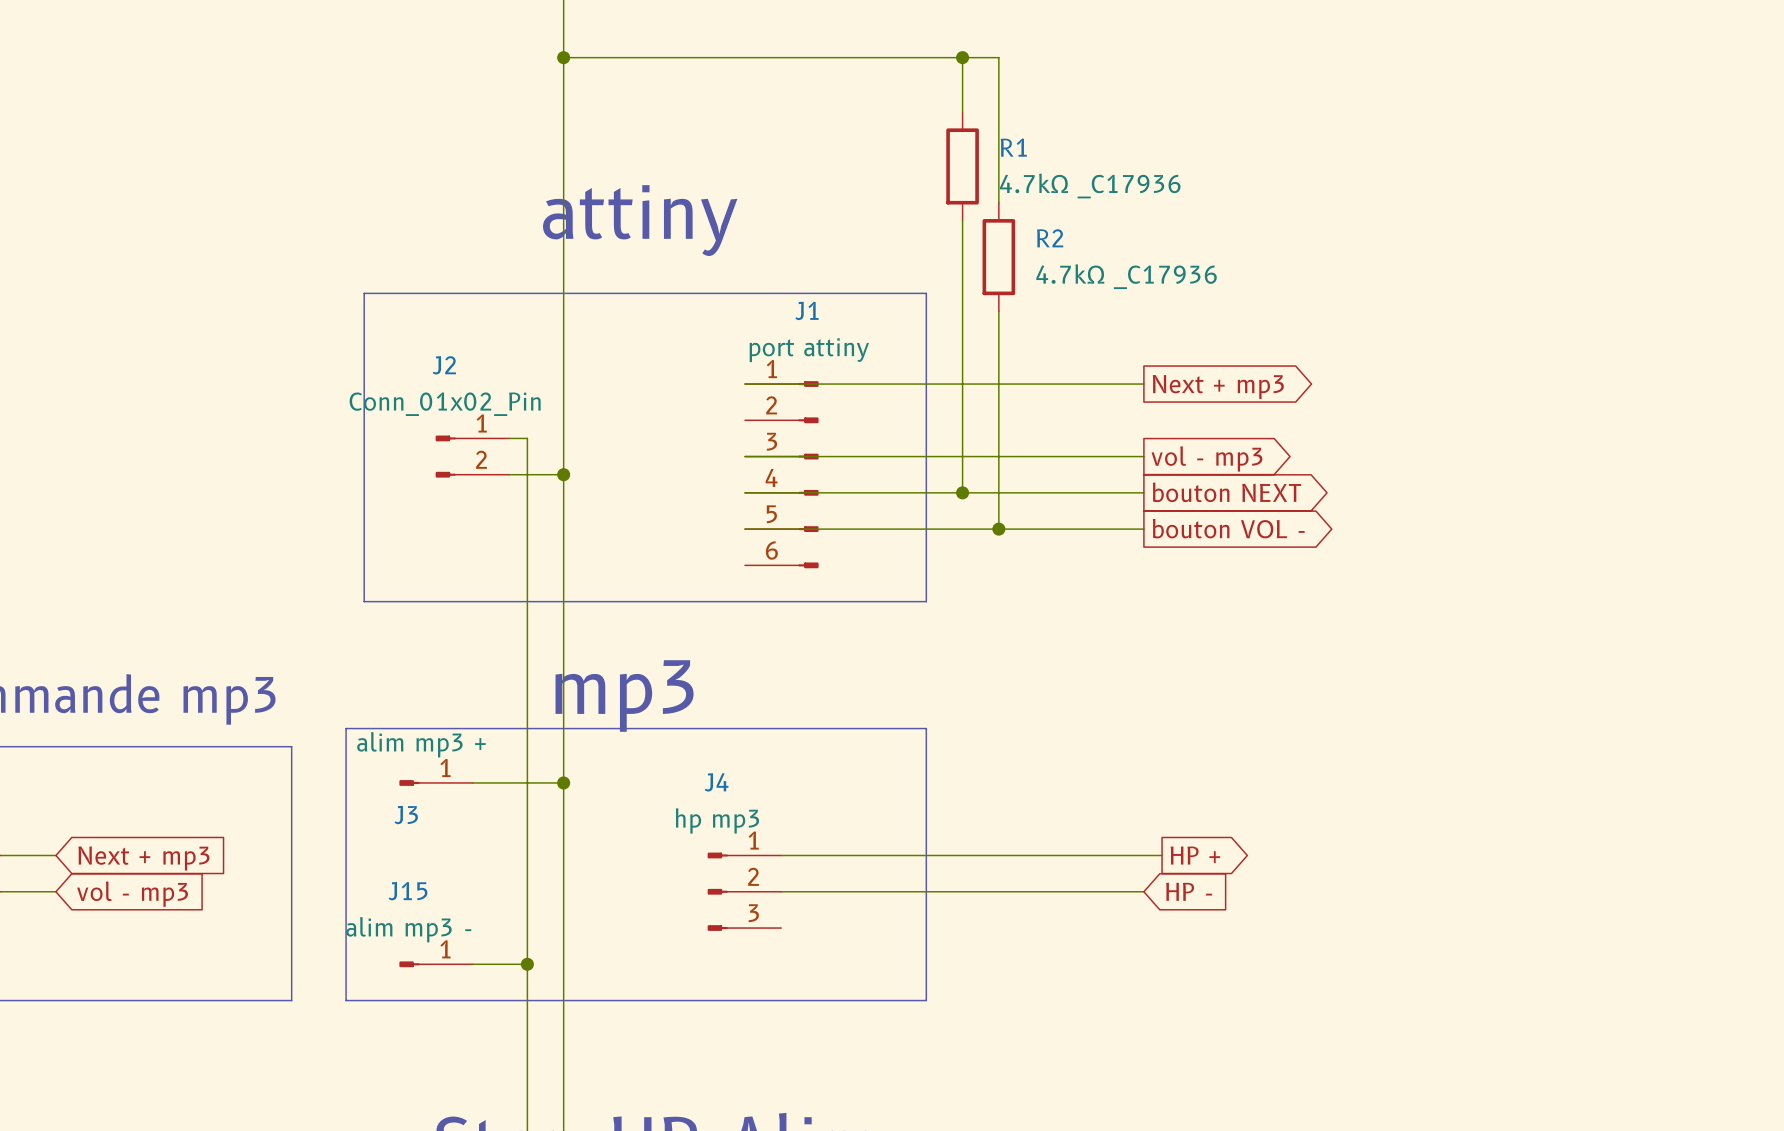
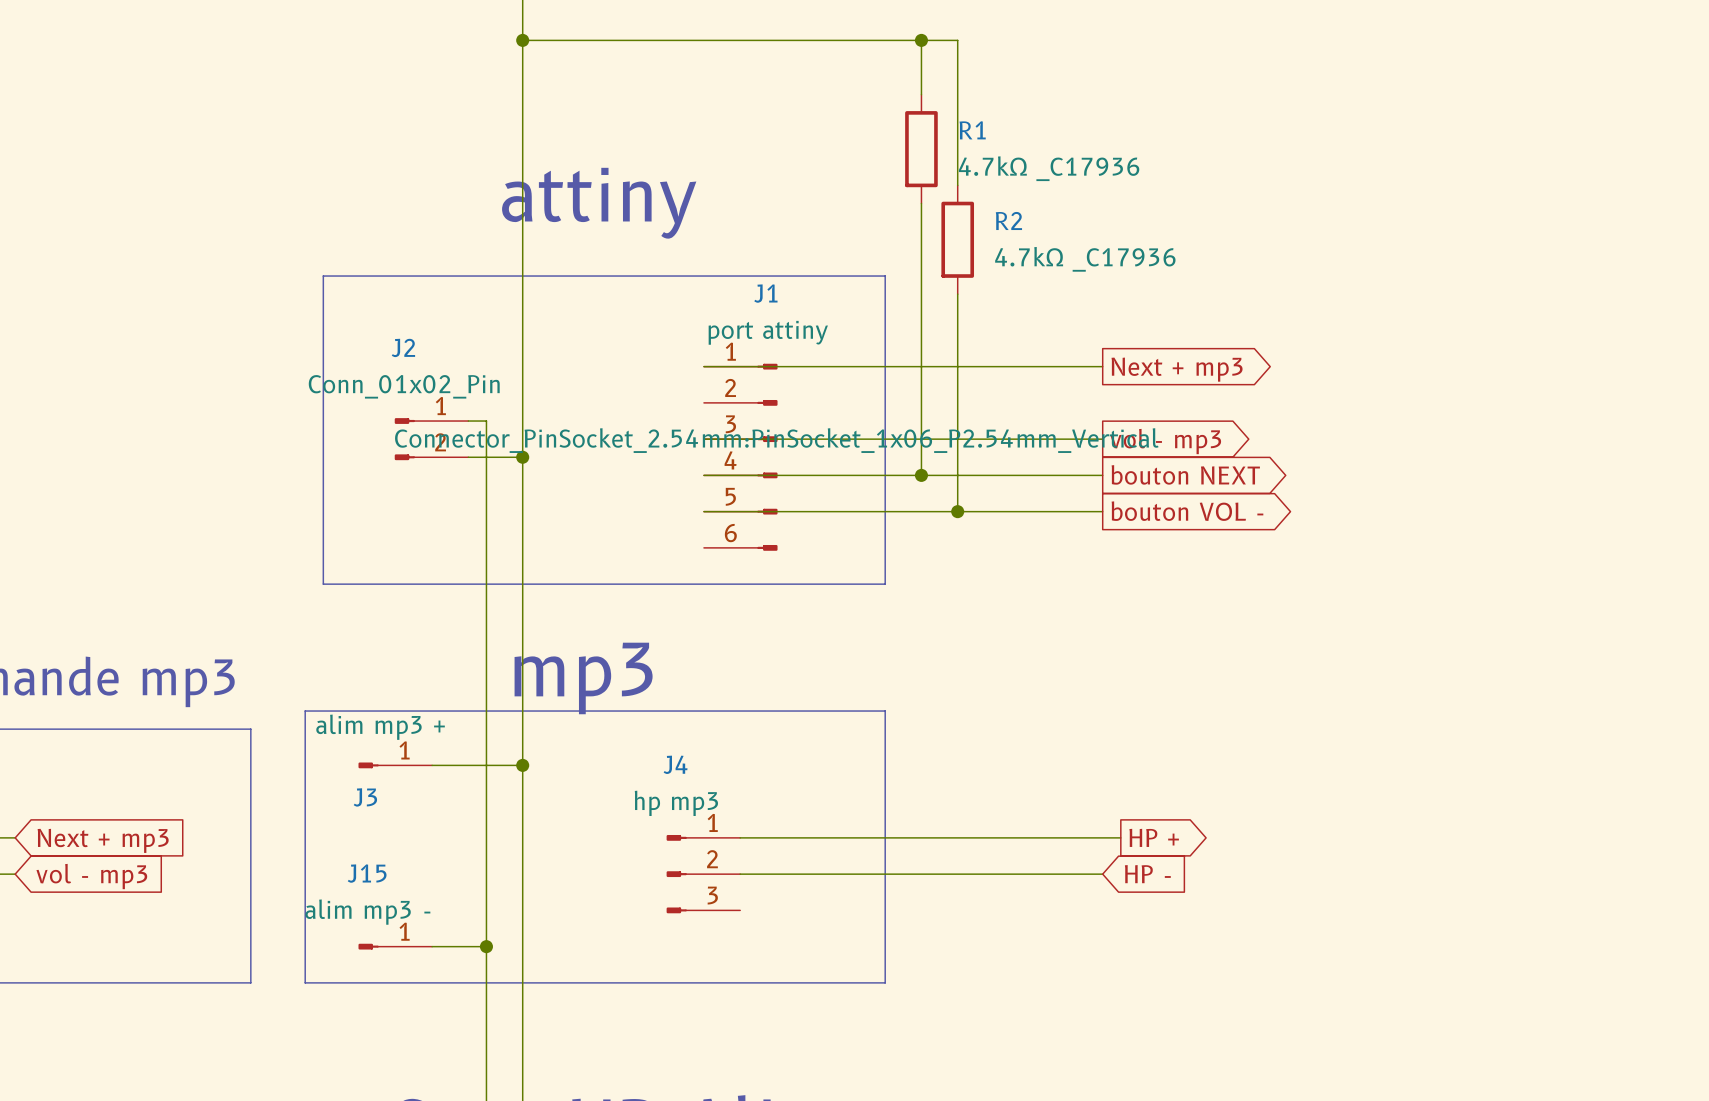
J1 text: none -> Connector_PinSocket_2.54mm:PinSocket_1x06_P2.54mm_Vertical (776, 440)

